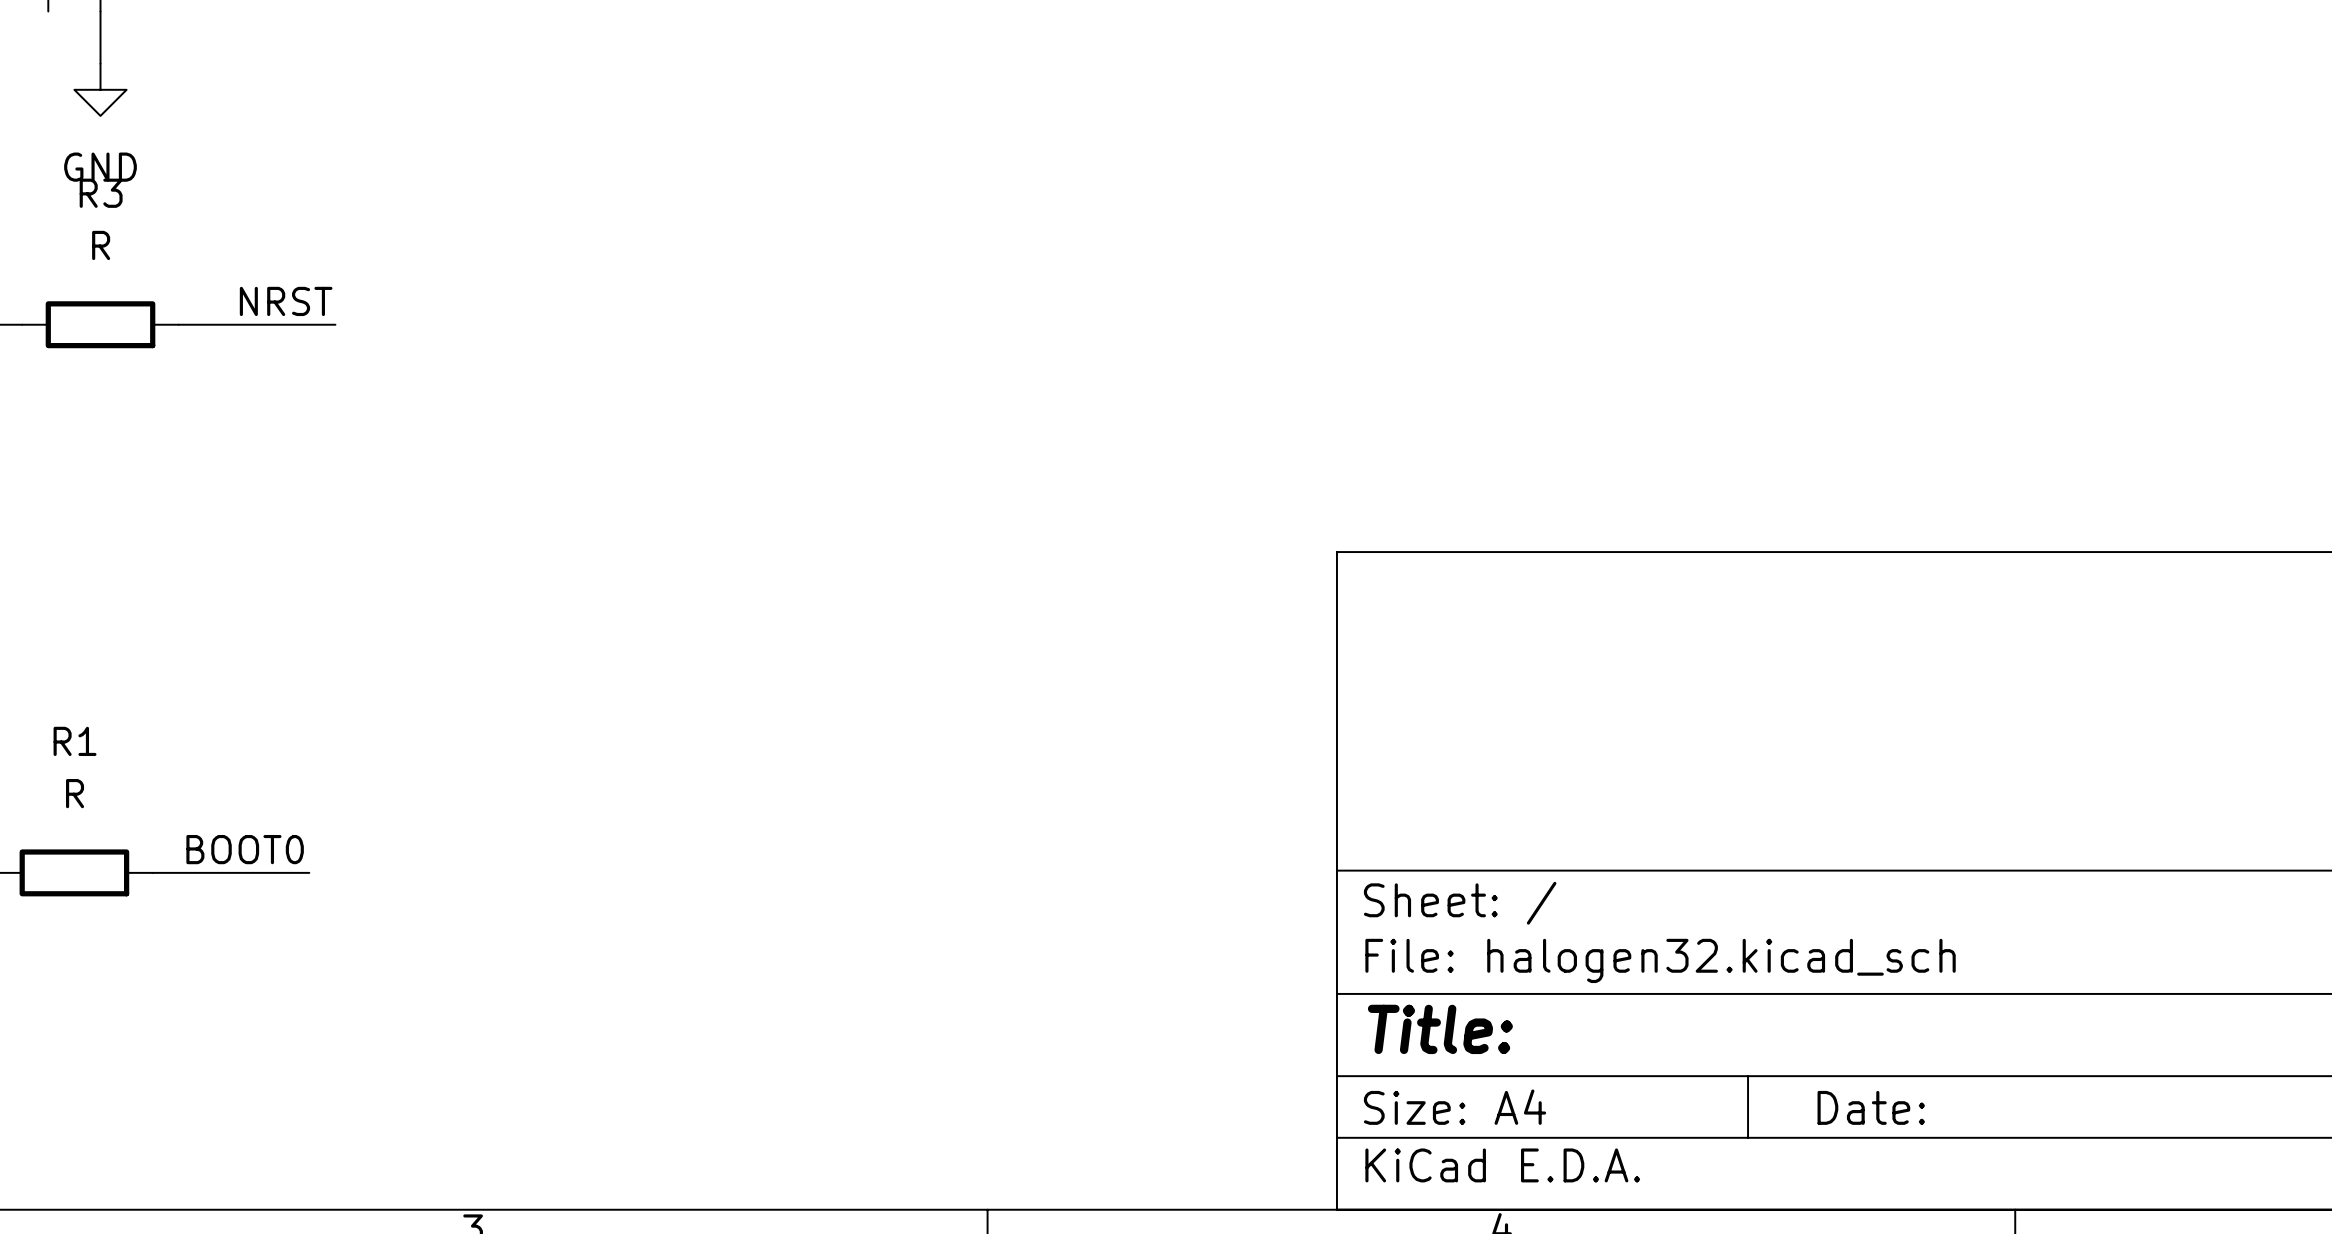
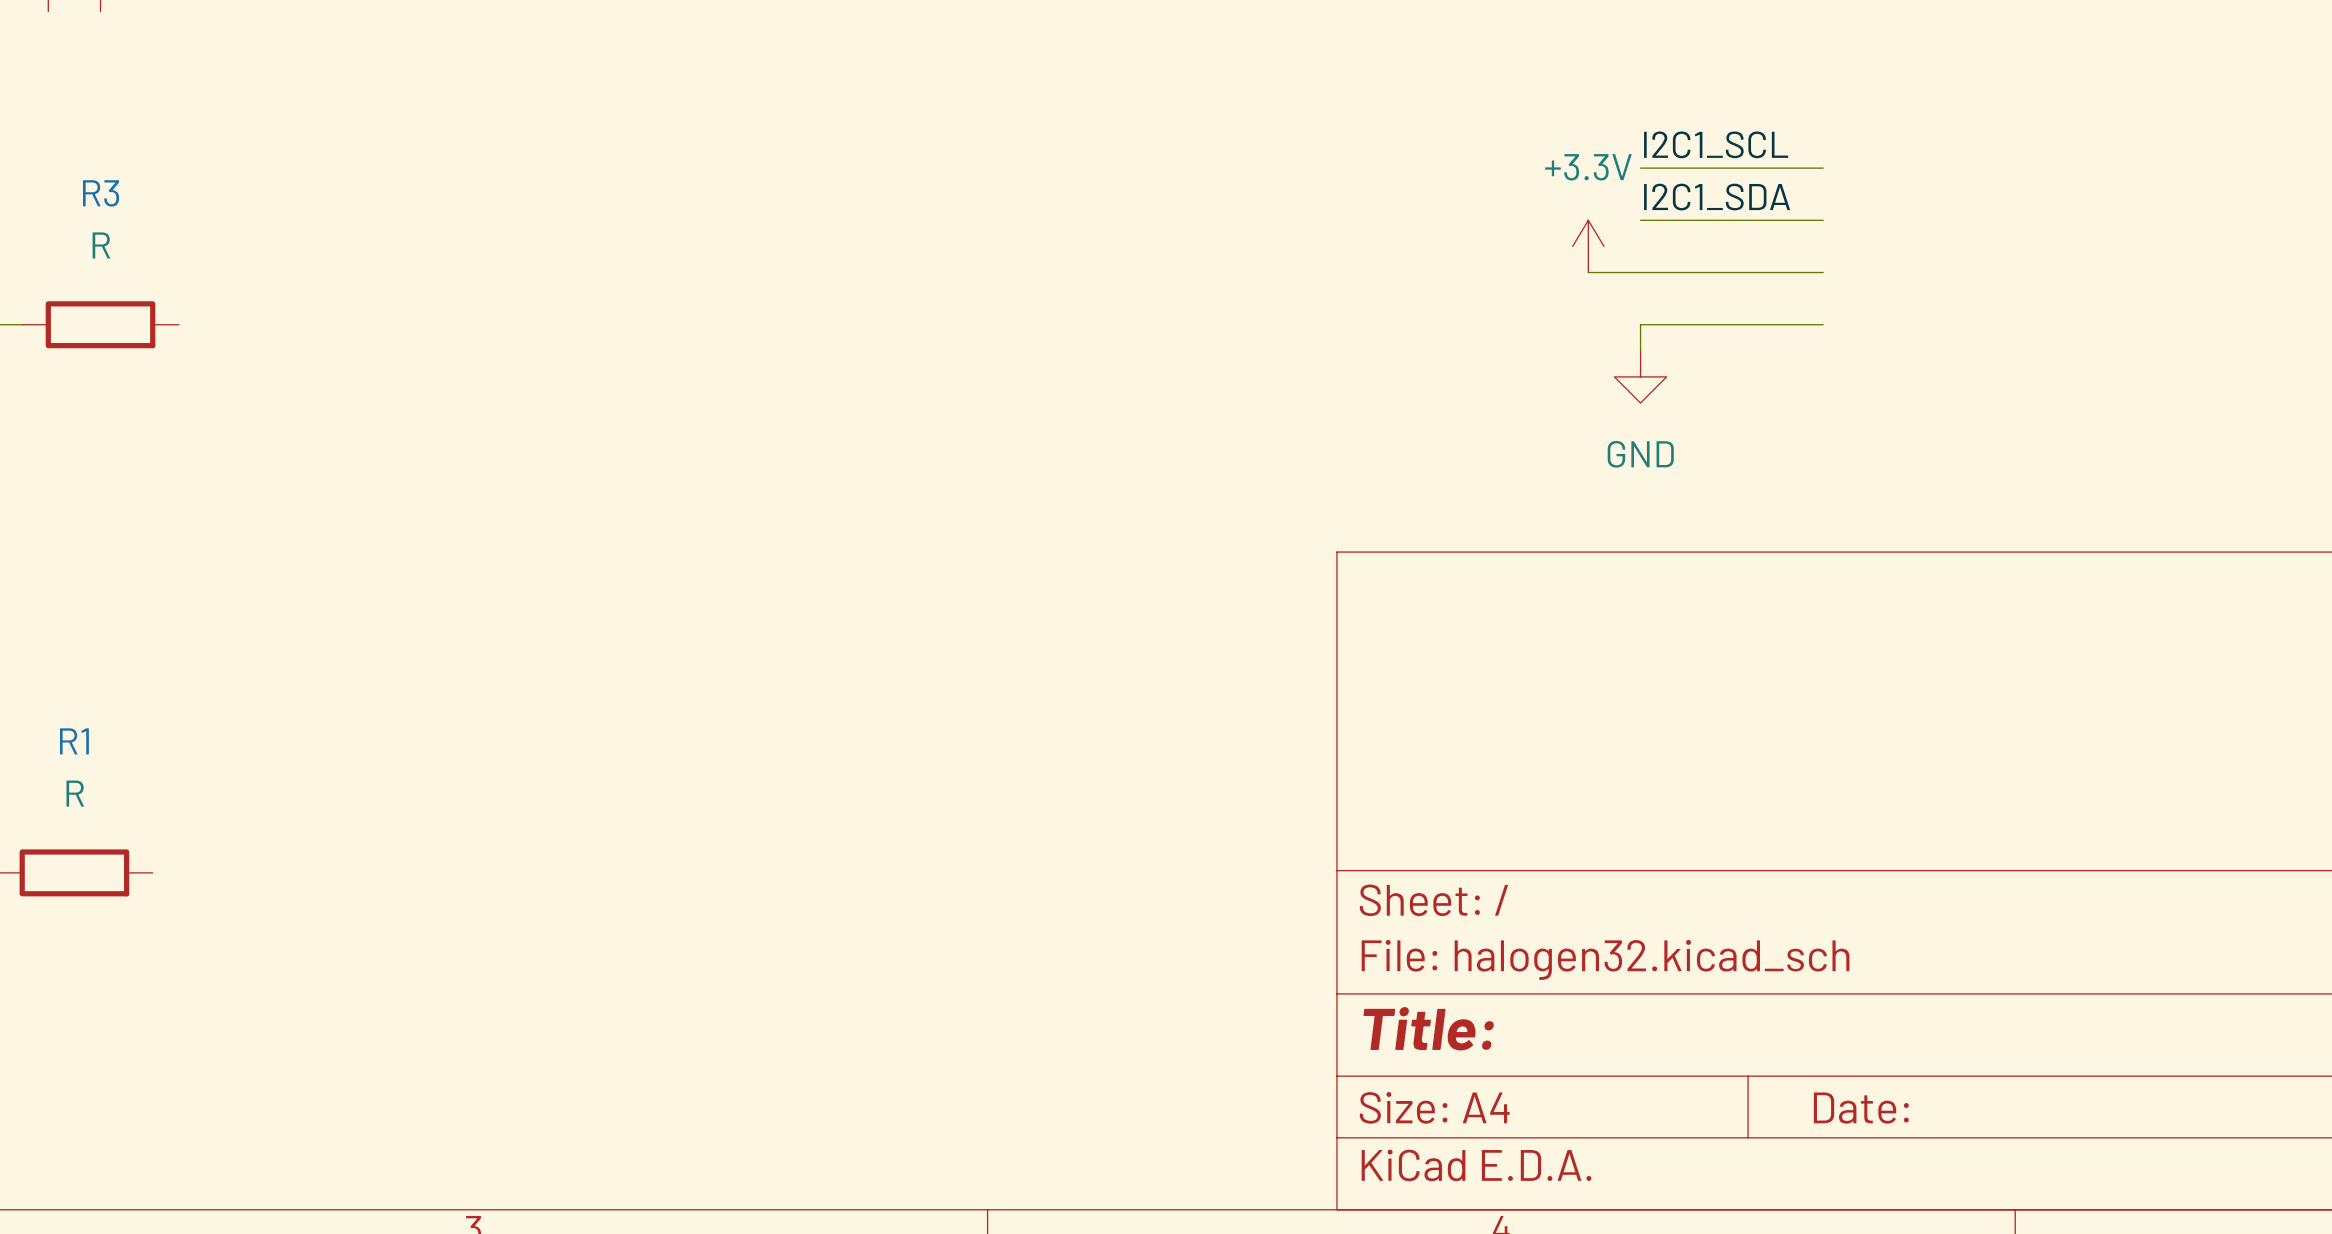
wire: (100, 11) (100, 63) -> none
power symbol: GND (100, 89) -> none
label: none -> I2C1_SCL (1716, 144)
wire: none -> (1640, 168) (1823, 168)
label: none -> I2C1_SDA (1717, 197)
wire: none -> (1640, 220) (1823, 220)
power symbol: none -> +3.3V (1588, 246)
wire: none -> (1588, 272) (1823, 272)
label: NRST (286, 301) -> none
wire: (178, 324) (335, 324) -> none
wire: none -> (1823, 324) (1640, 324) (1640, 350)
power symbol: none -> GND (1640, 376)
label: BOOT0 (245, 849) -> none
wire: (152, 872) (309, 872) -> none

